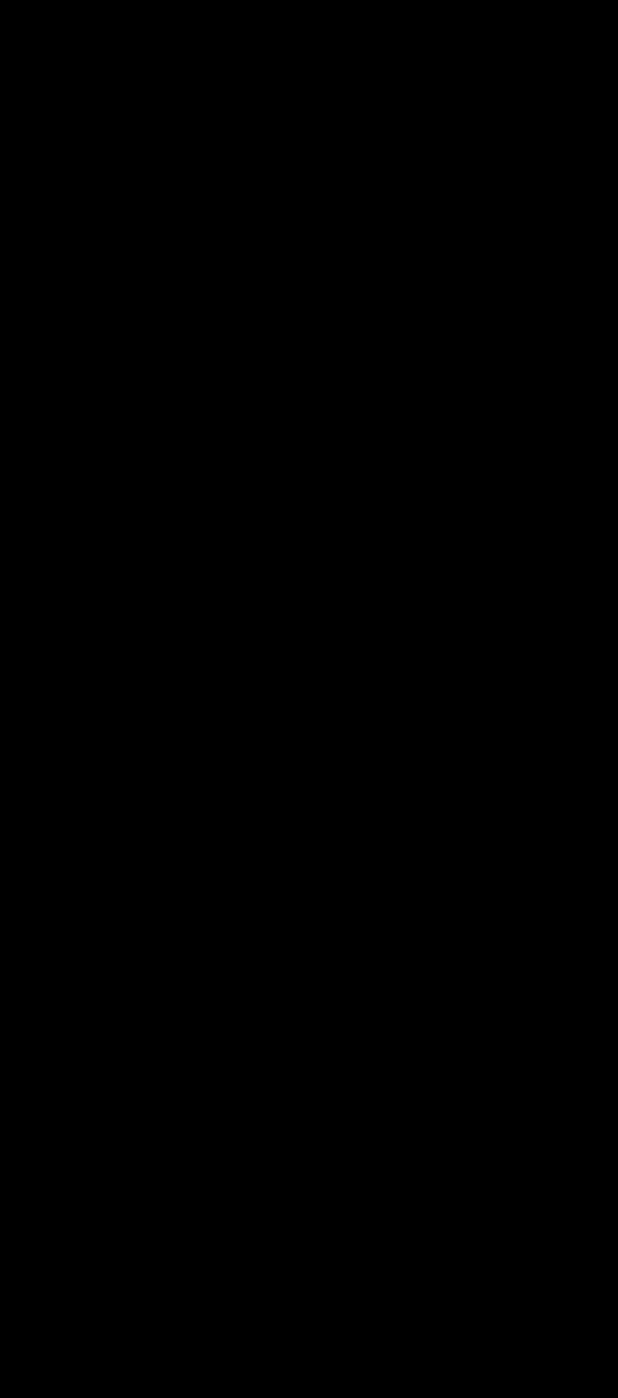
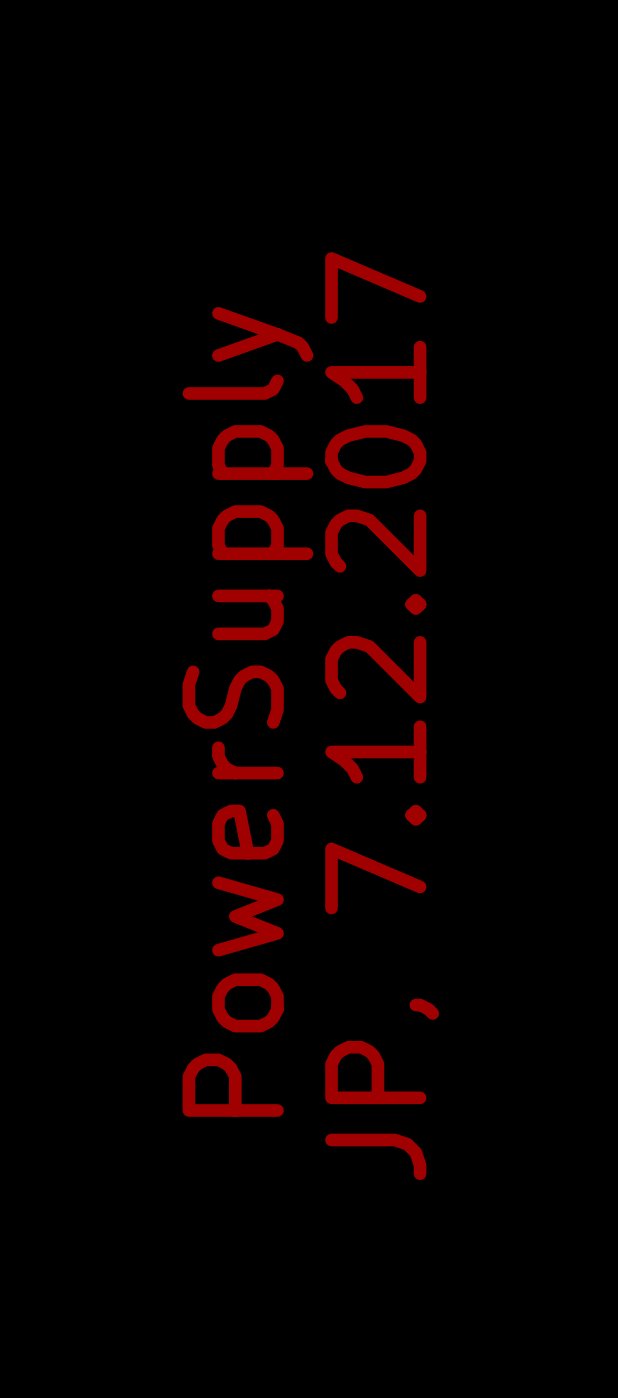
text: none -> PowerSupply (247, 711)
text: none -> JP, 7.12.2017 (382, 716)

